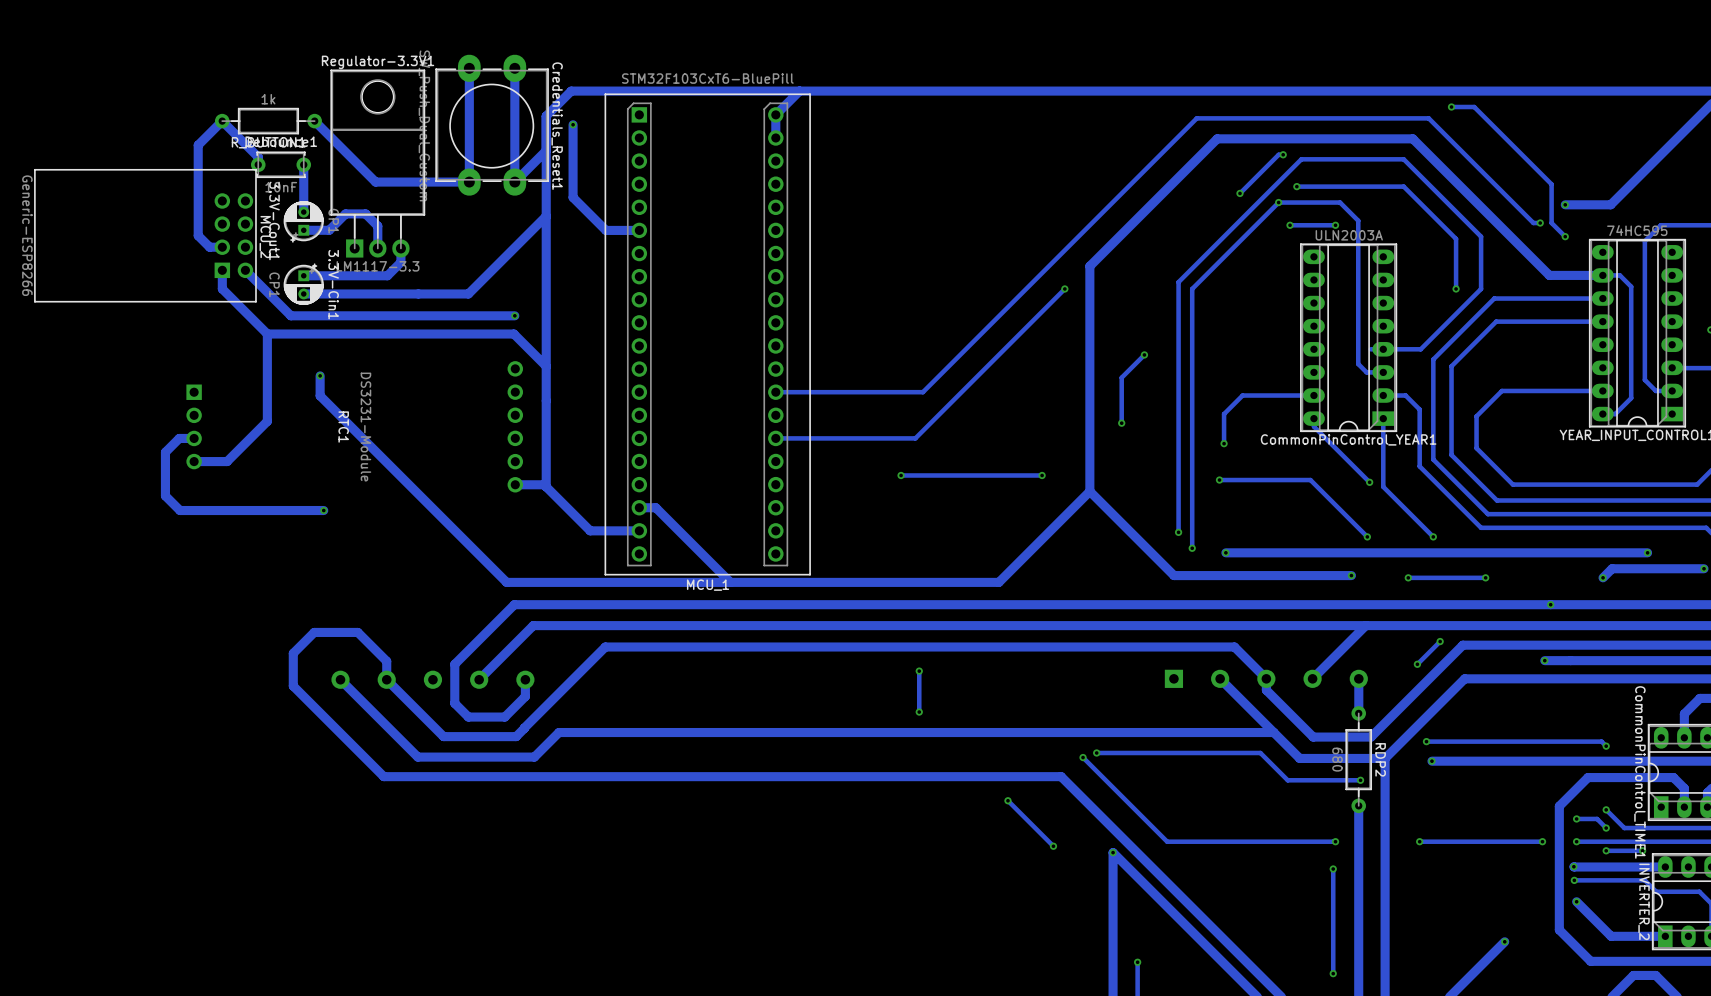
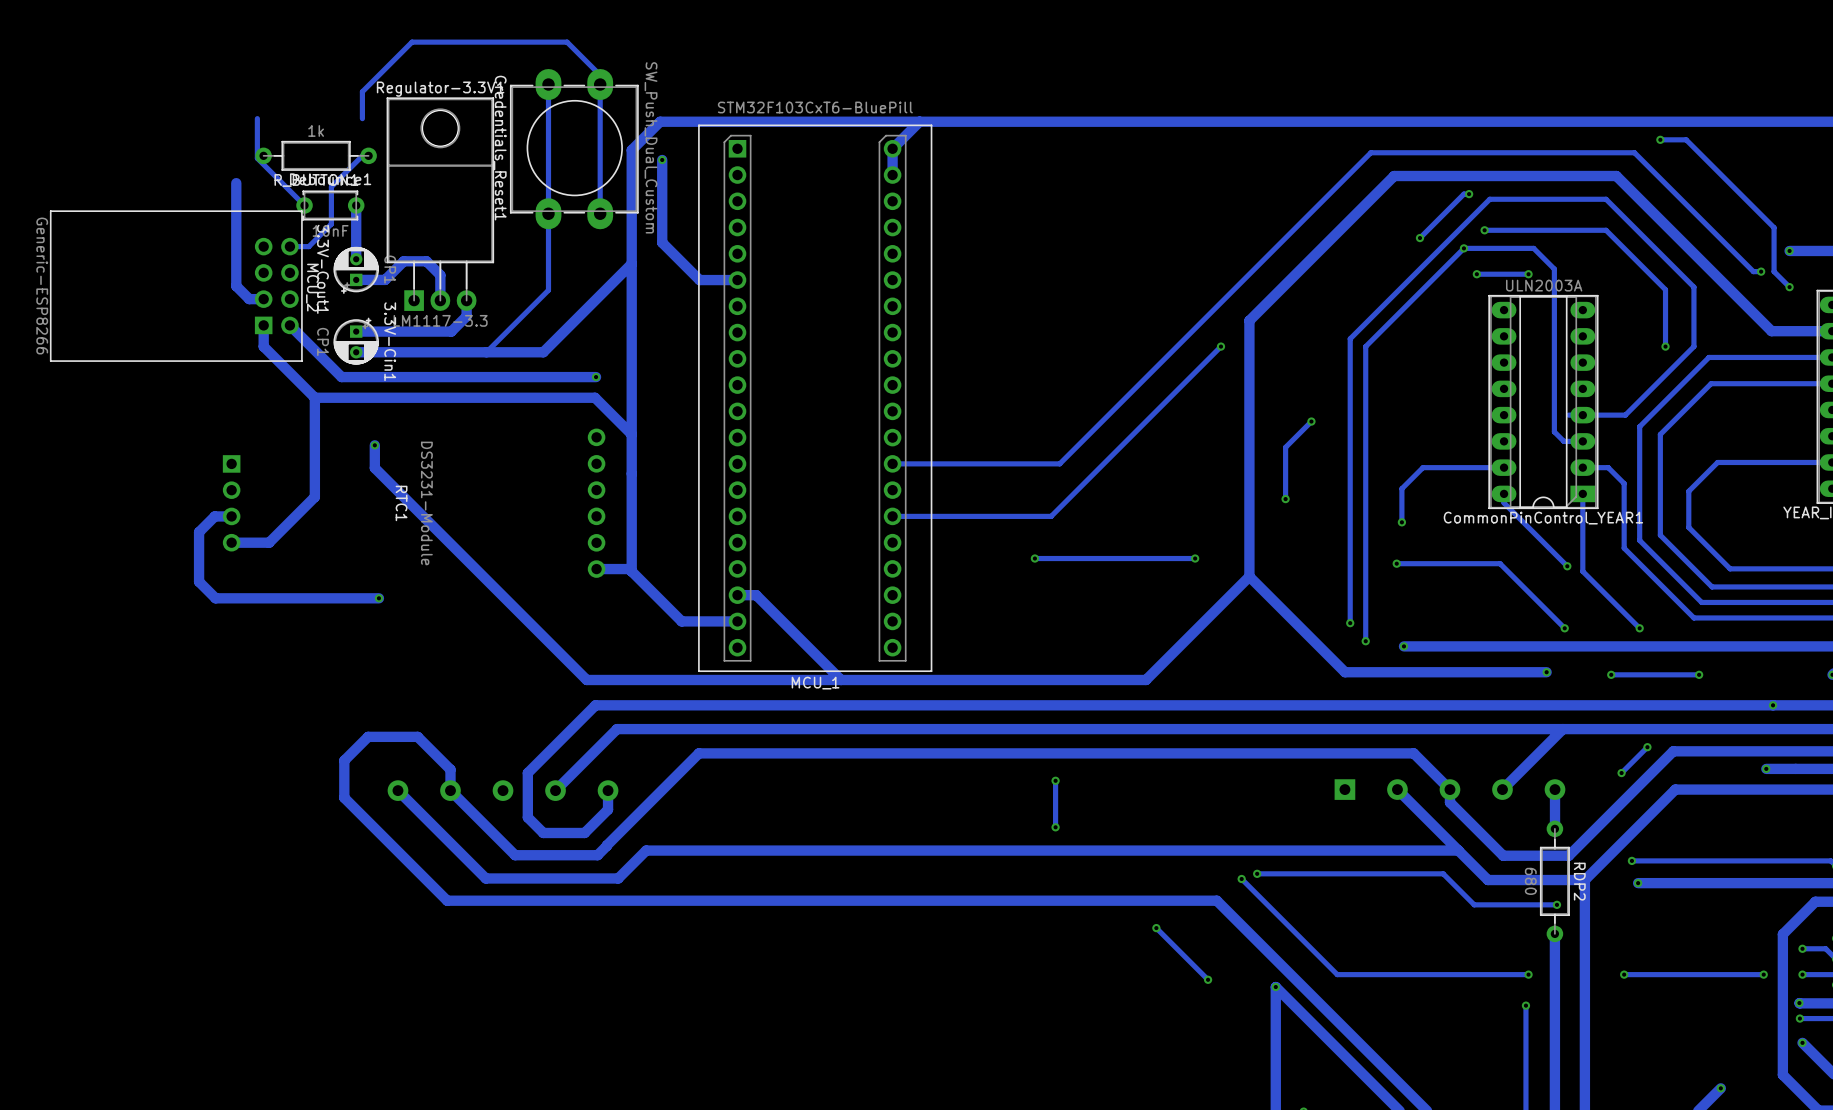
track: none -> (548, 84) (548, 290) (486, 352)
track: (469, 68) (469, 182) (375, 182) (314, 121) -> none
track: (514, 68) (514, 182) (546, 150) -> none
track: none -> (362, 118) (362, 91) (412, 42) (567, 42) (600, 75) (600, 213)
track: none -> (362, 155) (331, 186) (331, 224) (308, 246) (289, 246)
Credentials_Reset1 rotation: 0° (492, 125) -> 180° (574, 149)
track: (198, 145) (222, 121) (258, 157) (258, 164) -> (257, 118) (257, 158) (304, 205)

